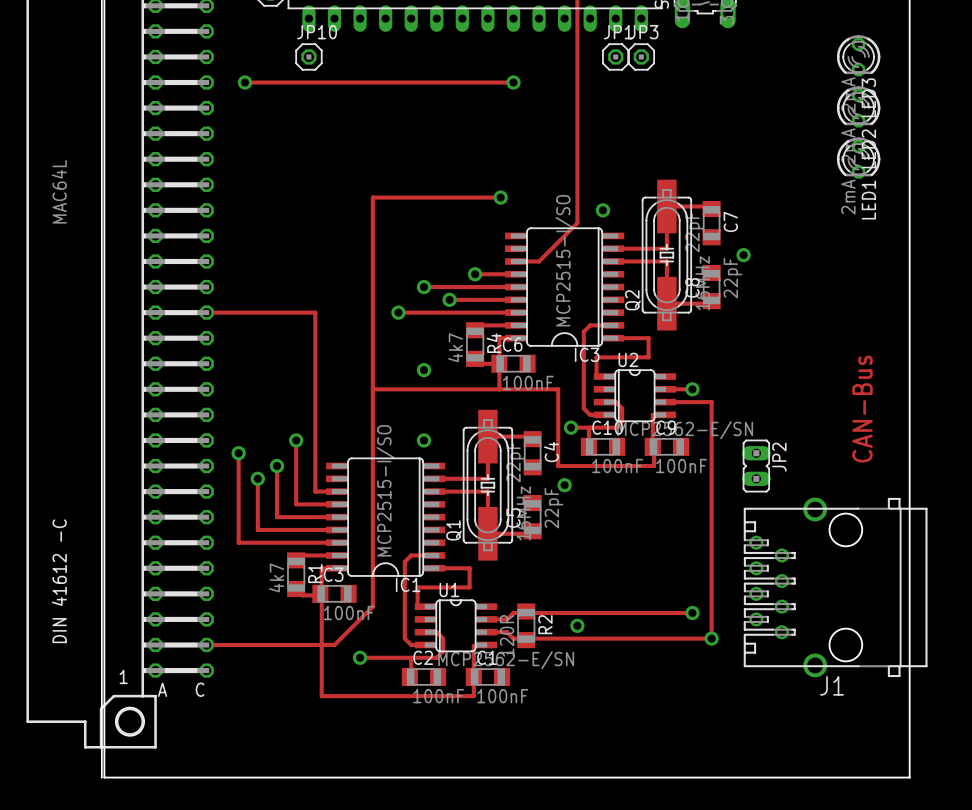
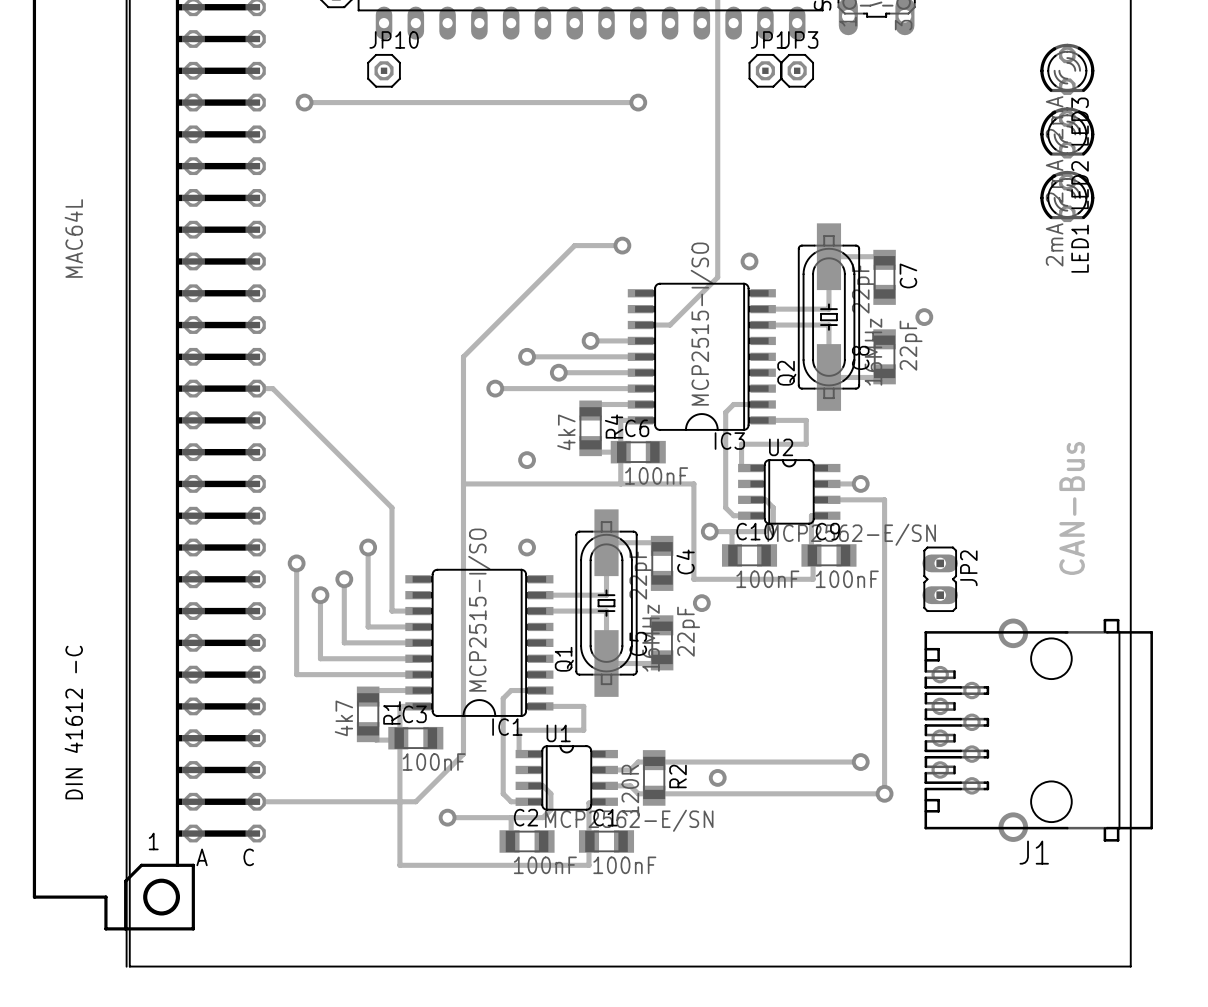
track: (462, 197) (372, 197) (372, 287) -> (574, 245) (463, 356)
track: (219, 312) (315, 312) (315, 408) -> (272, 388) (391, 507)

